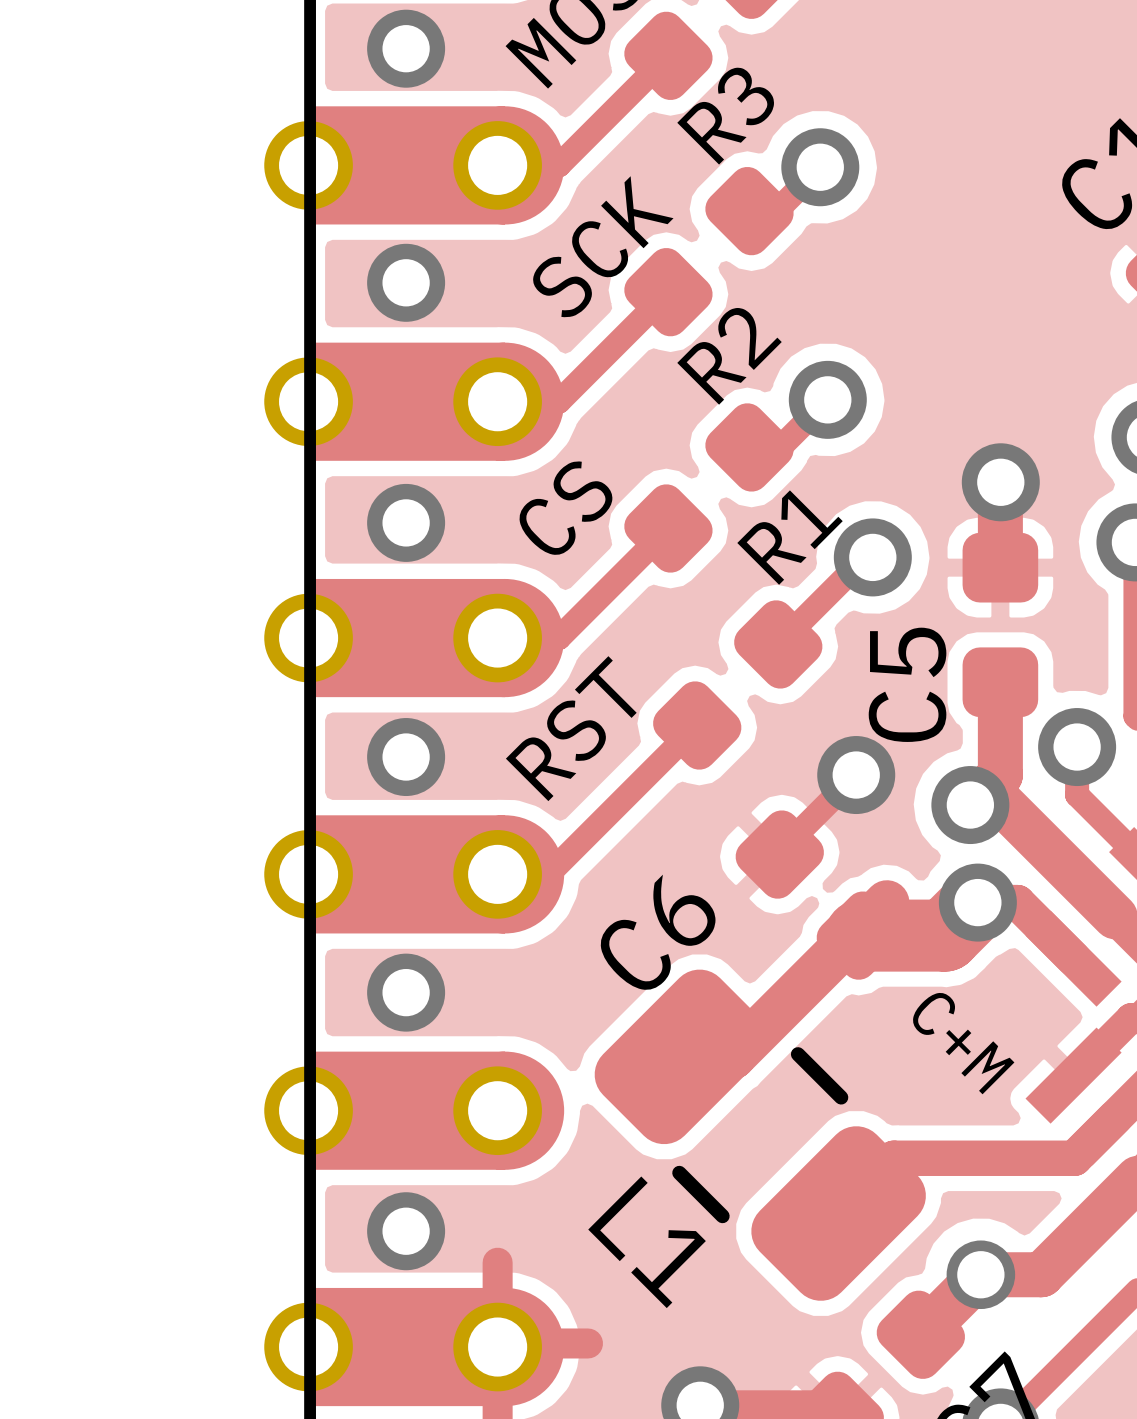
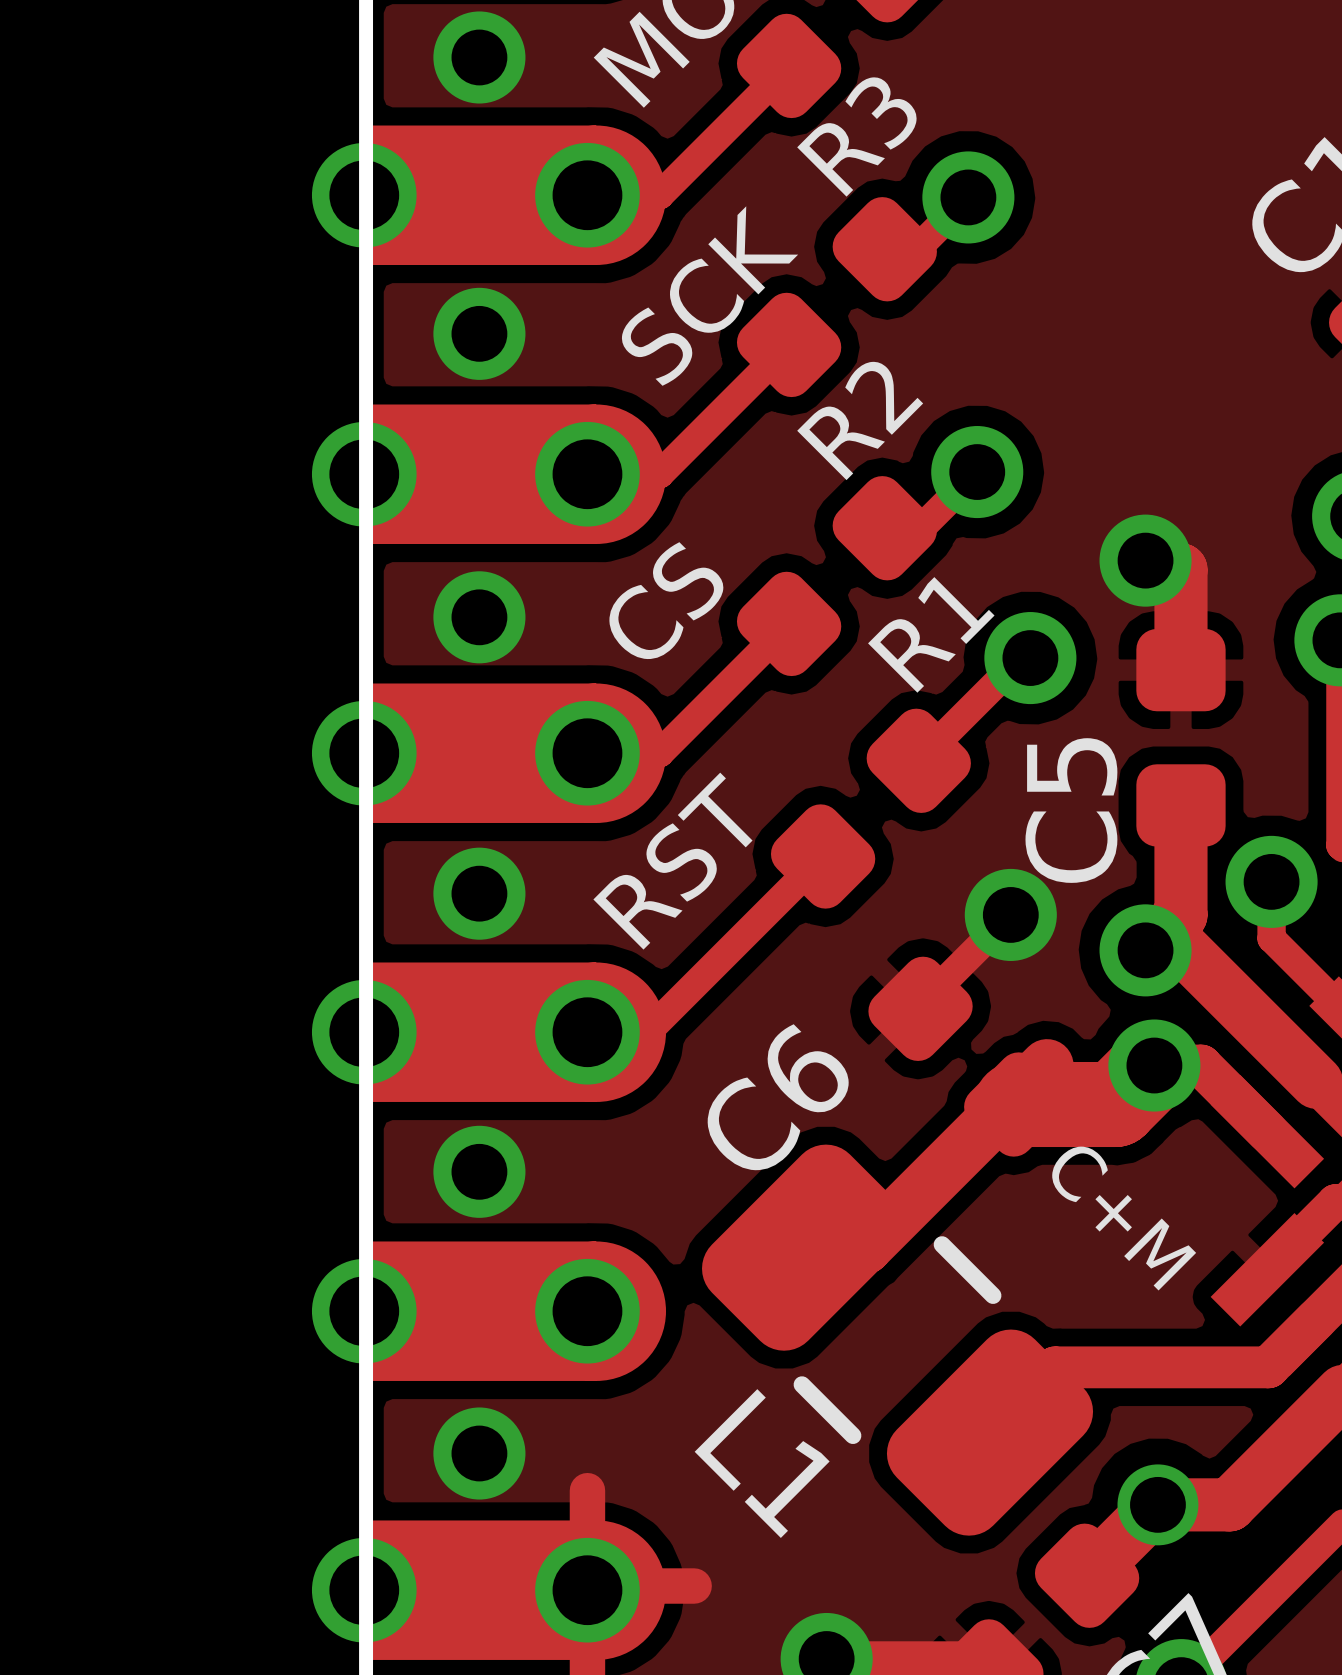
via position: (1000, 482) -> (1145, 560)

